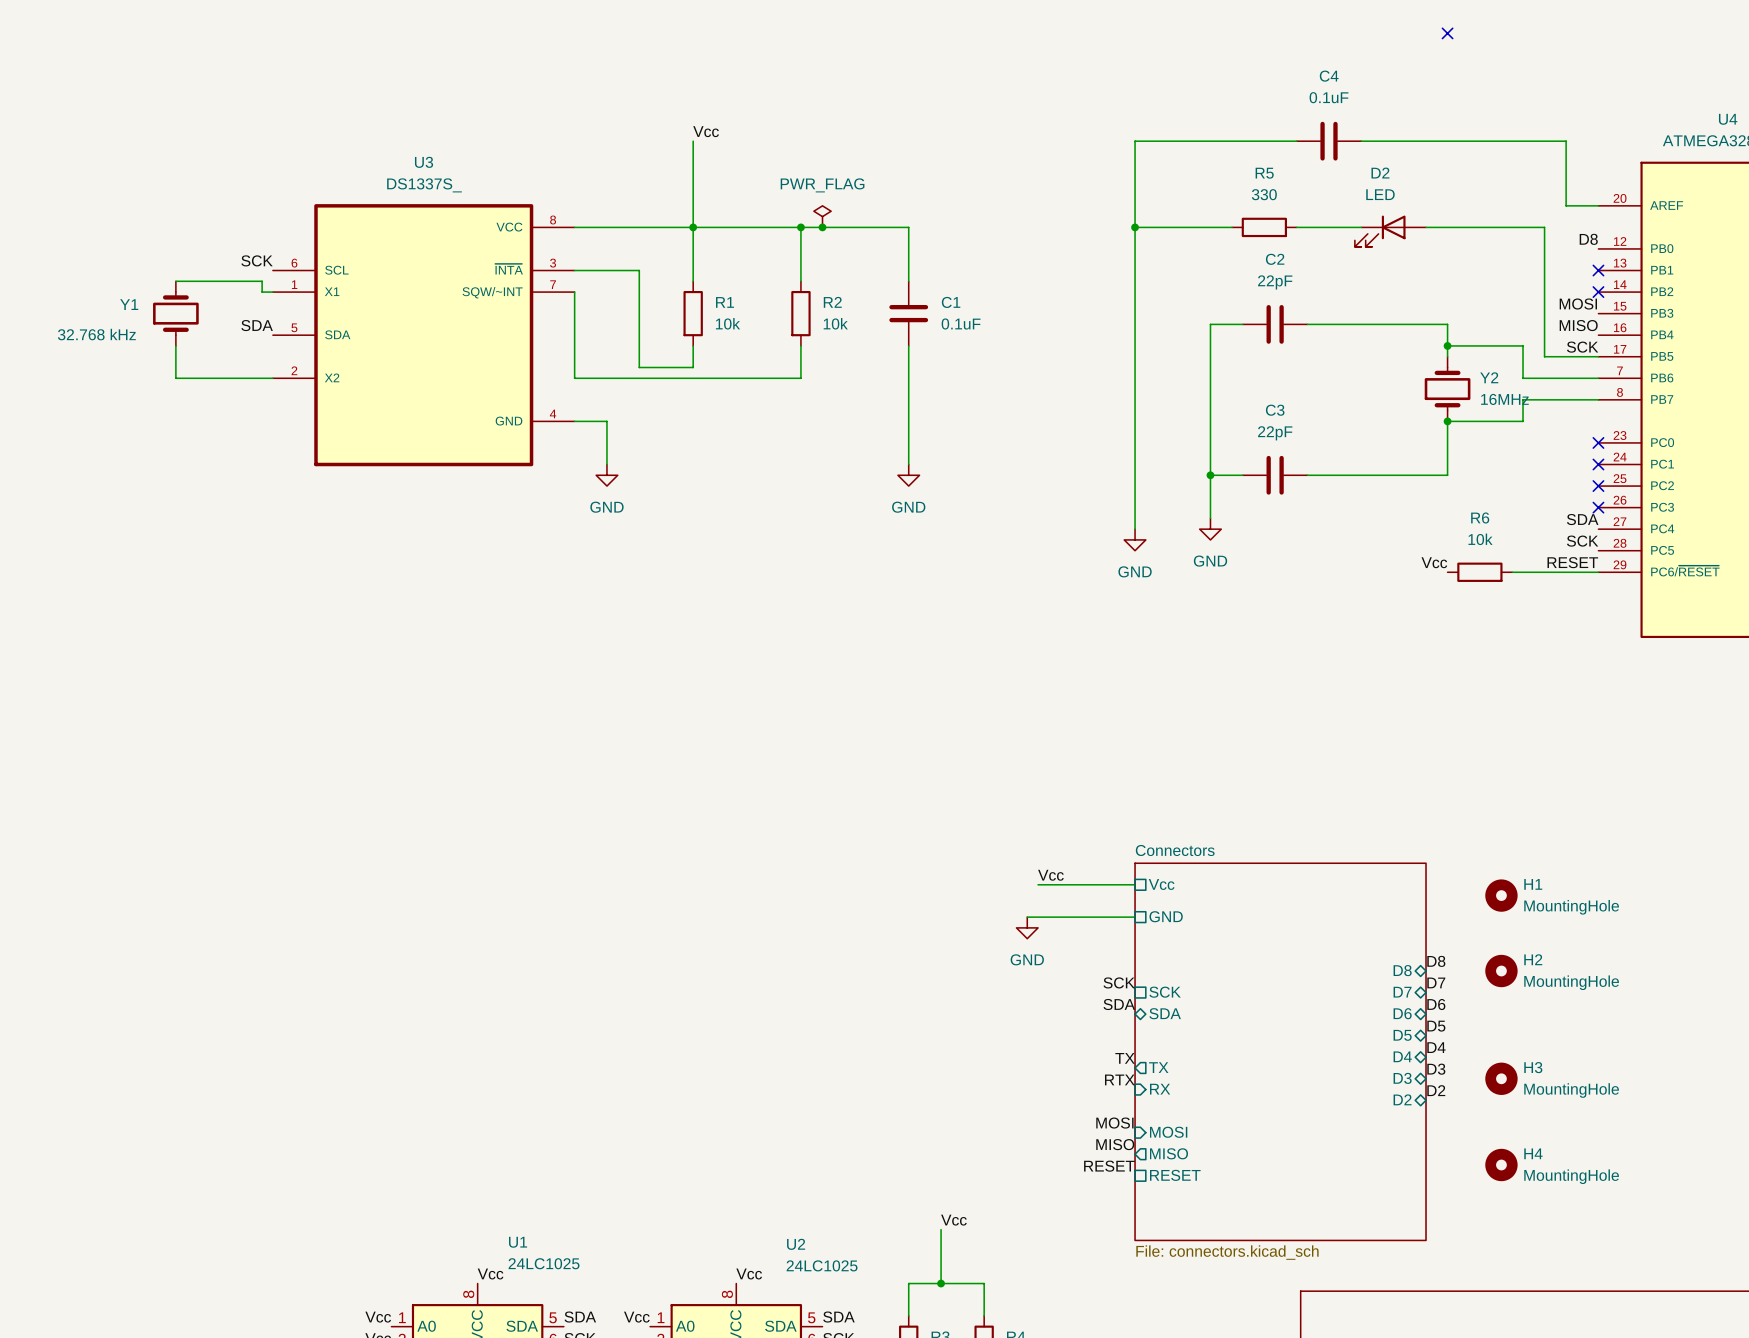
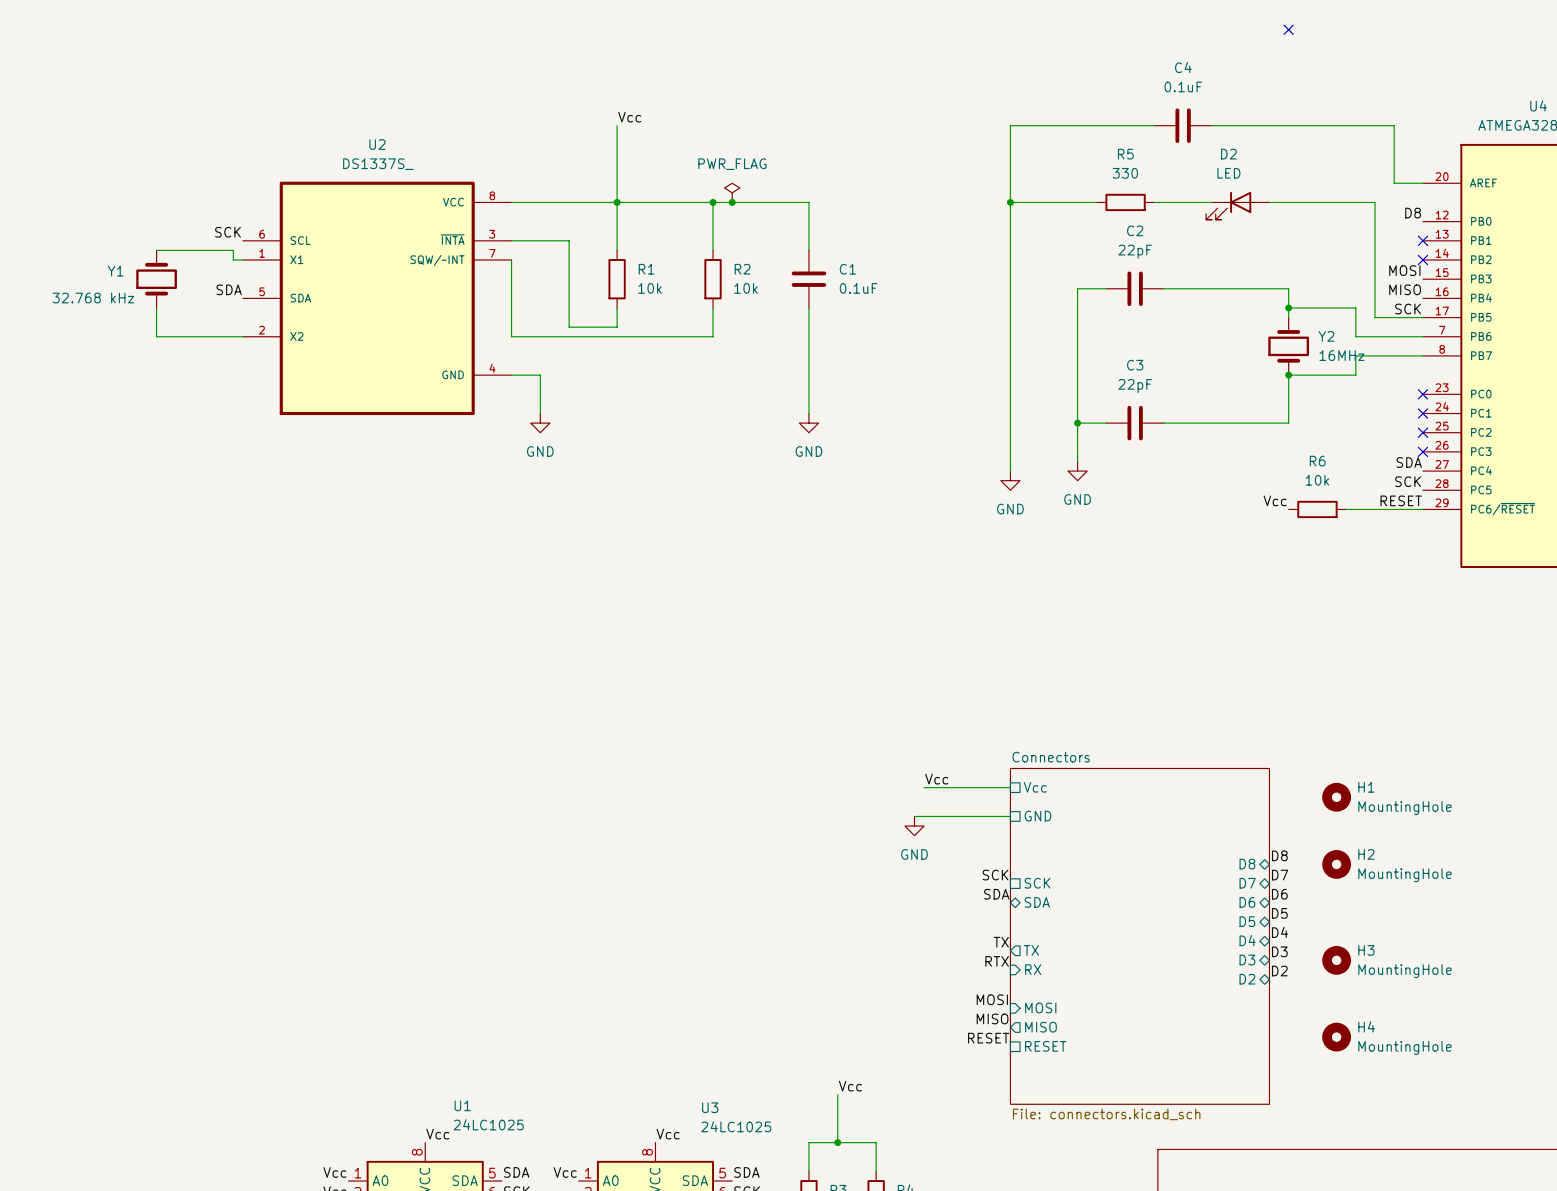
U3 name: U3 (424, 162) -> U2 (377, 144)
U2 name: U2 (796, 1244) -> U3 (710, 1107)

